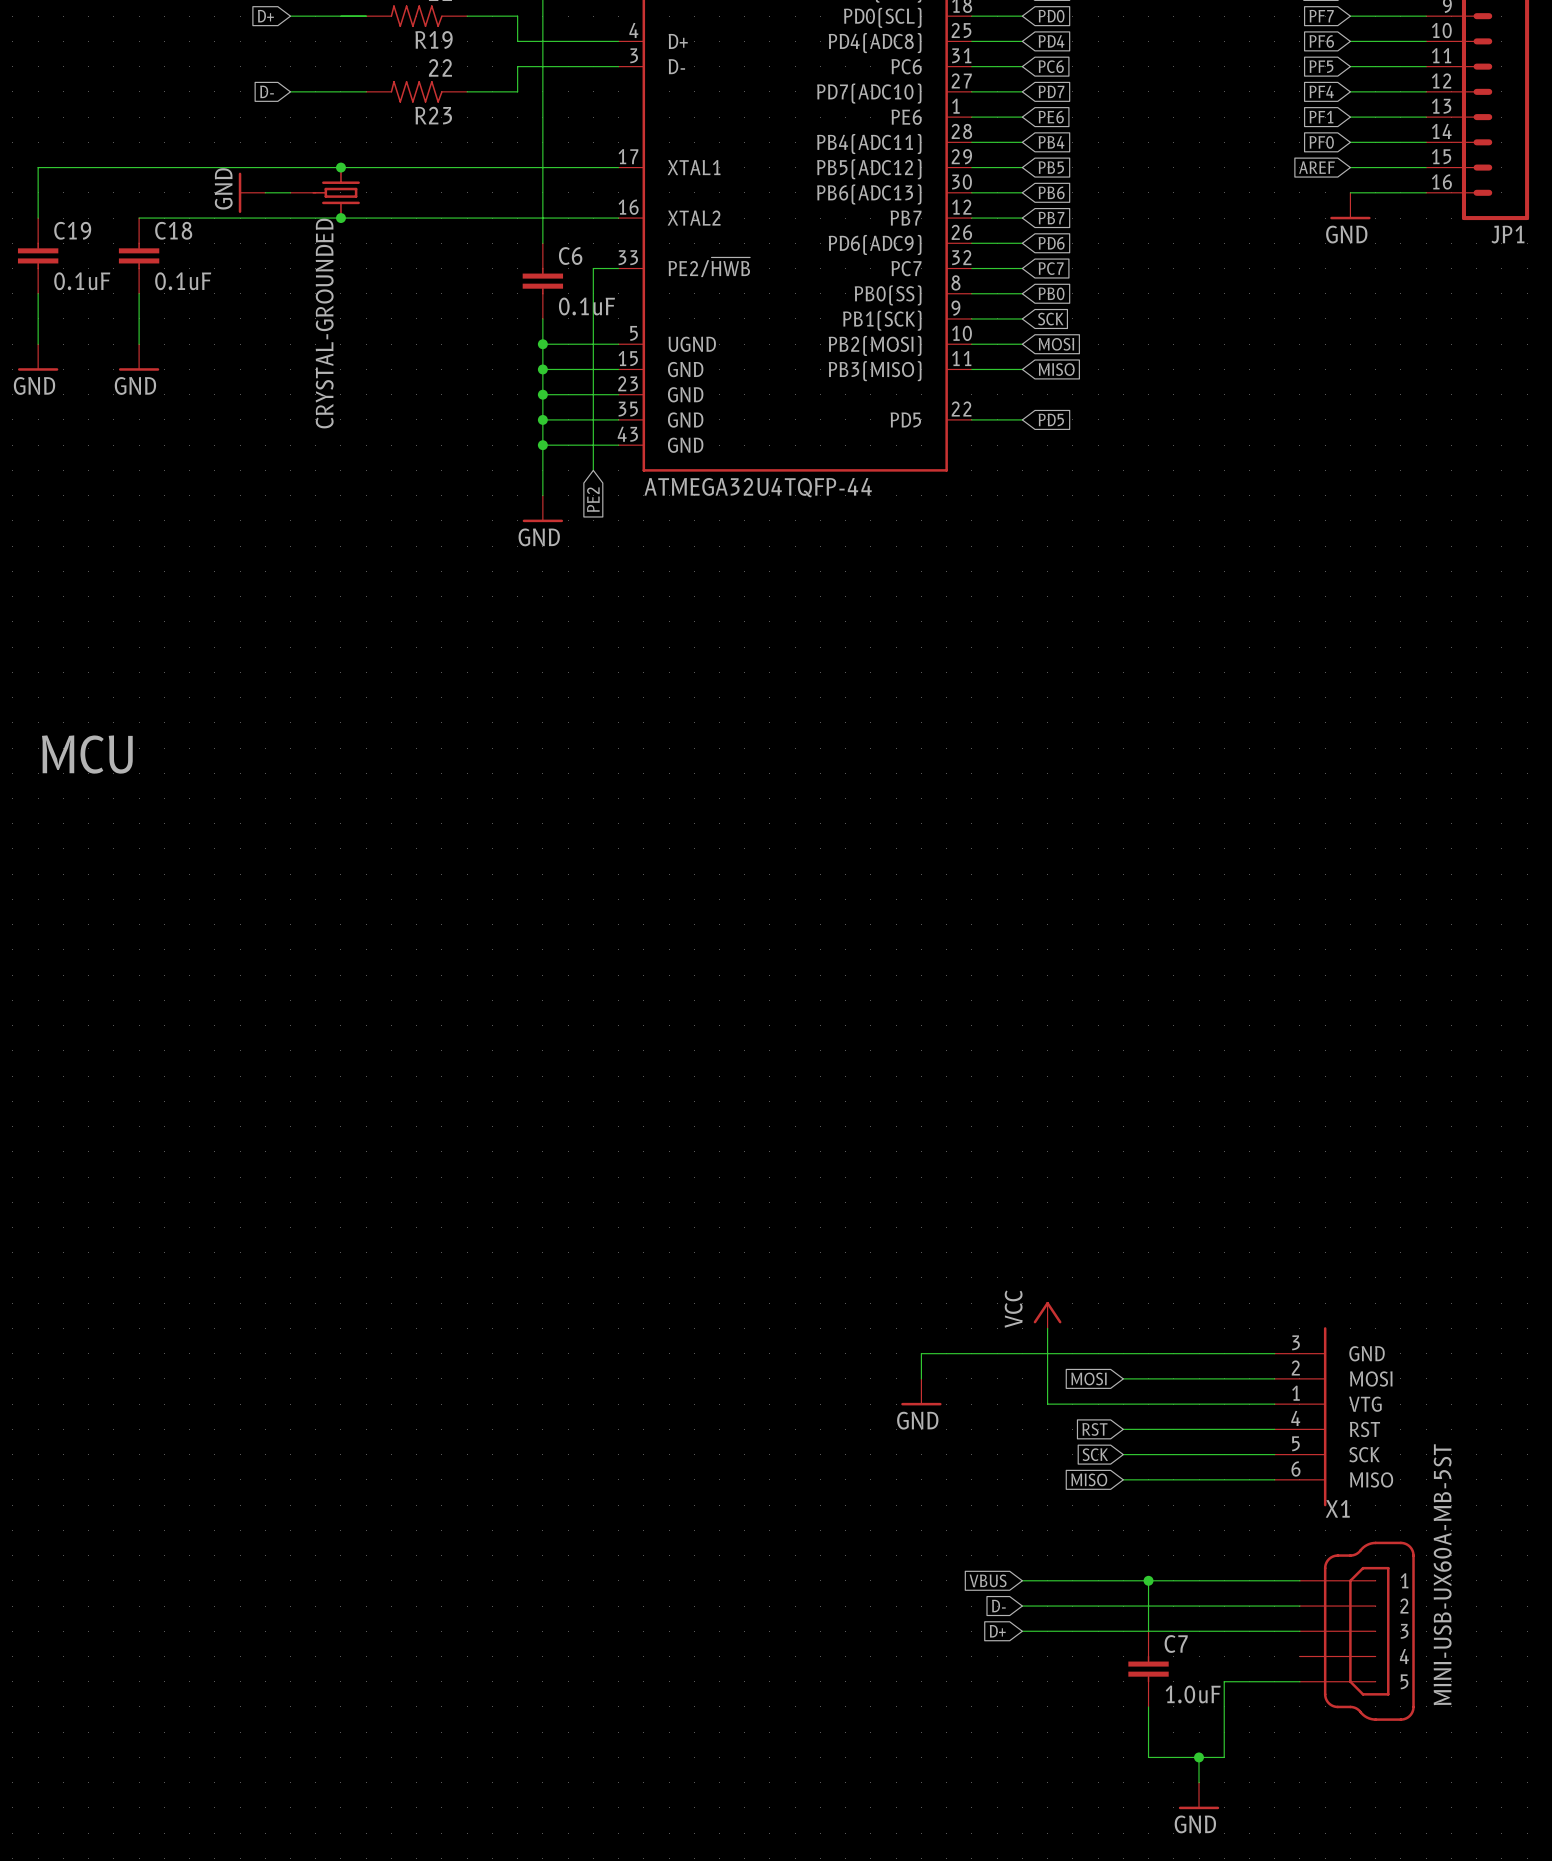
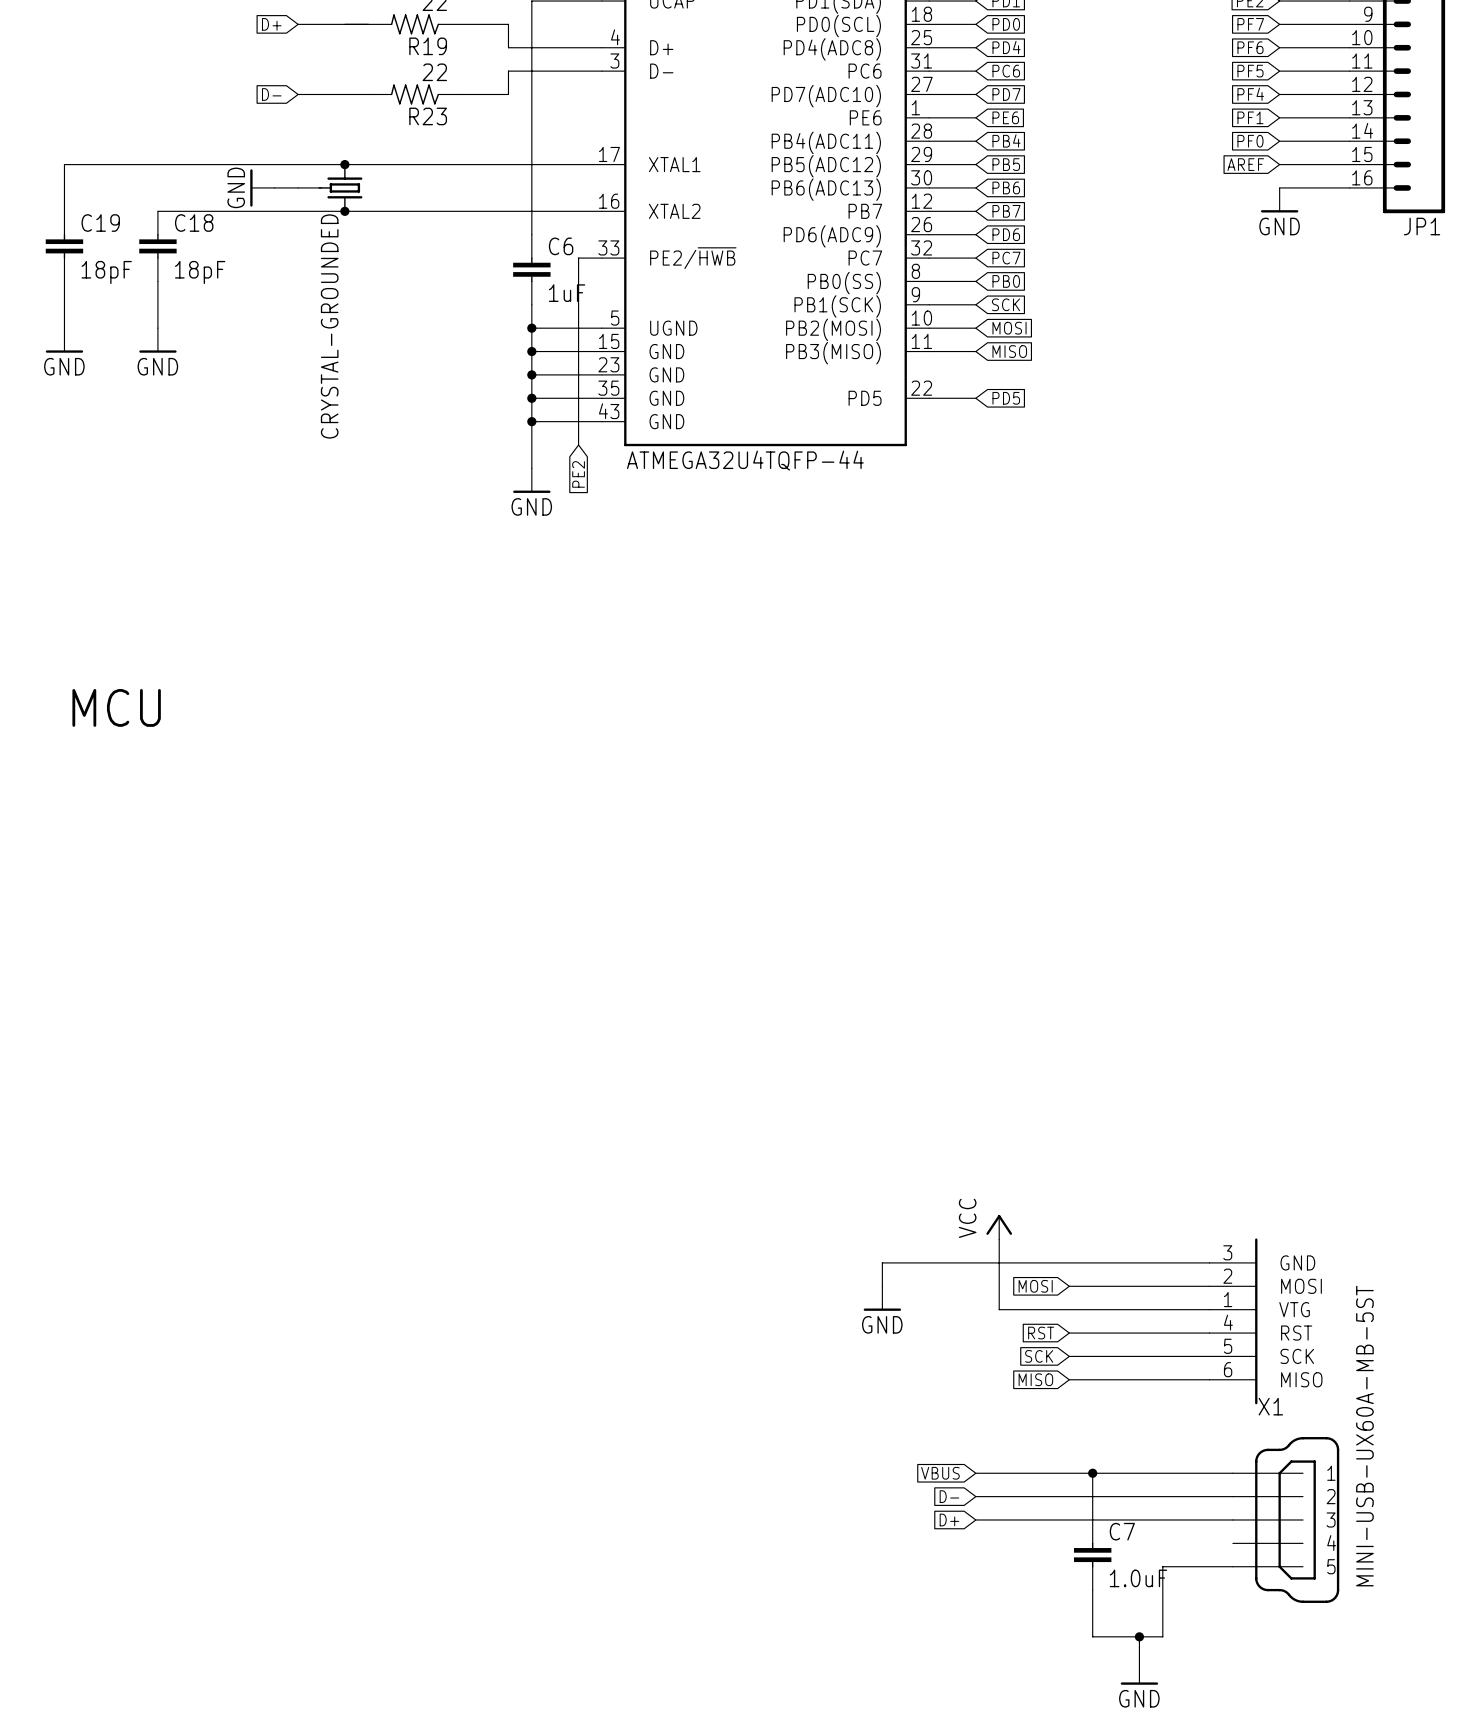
C19 value: 0.1uF (82, 281) -> 18pF (106, 272)
C18 value: 0.1uF (183, 281) -> 18pF (200, 272)
C6 value: 0.1uF (586, 306) -> 1uF (567, 293)

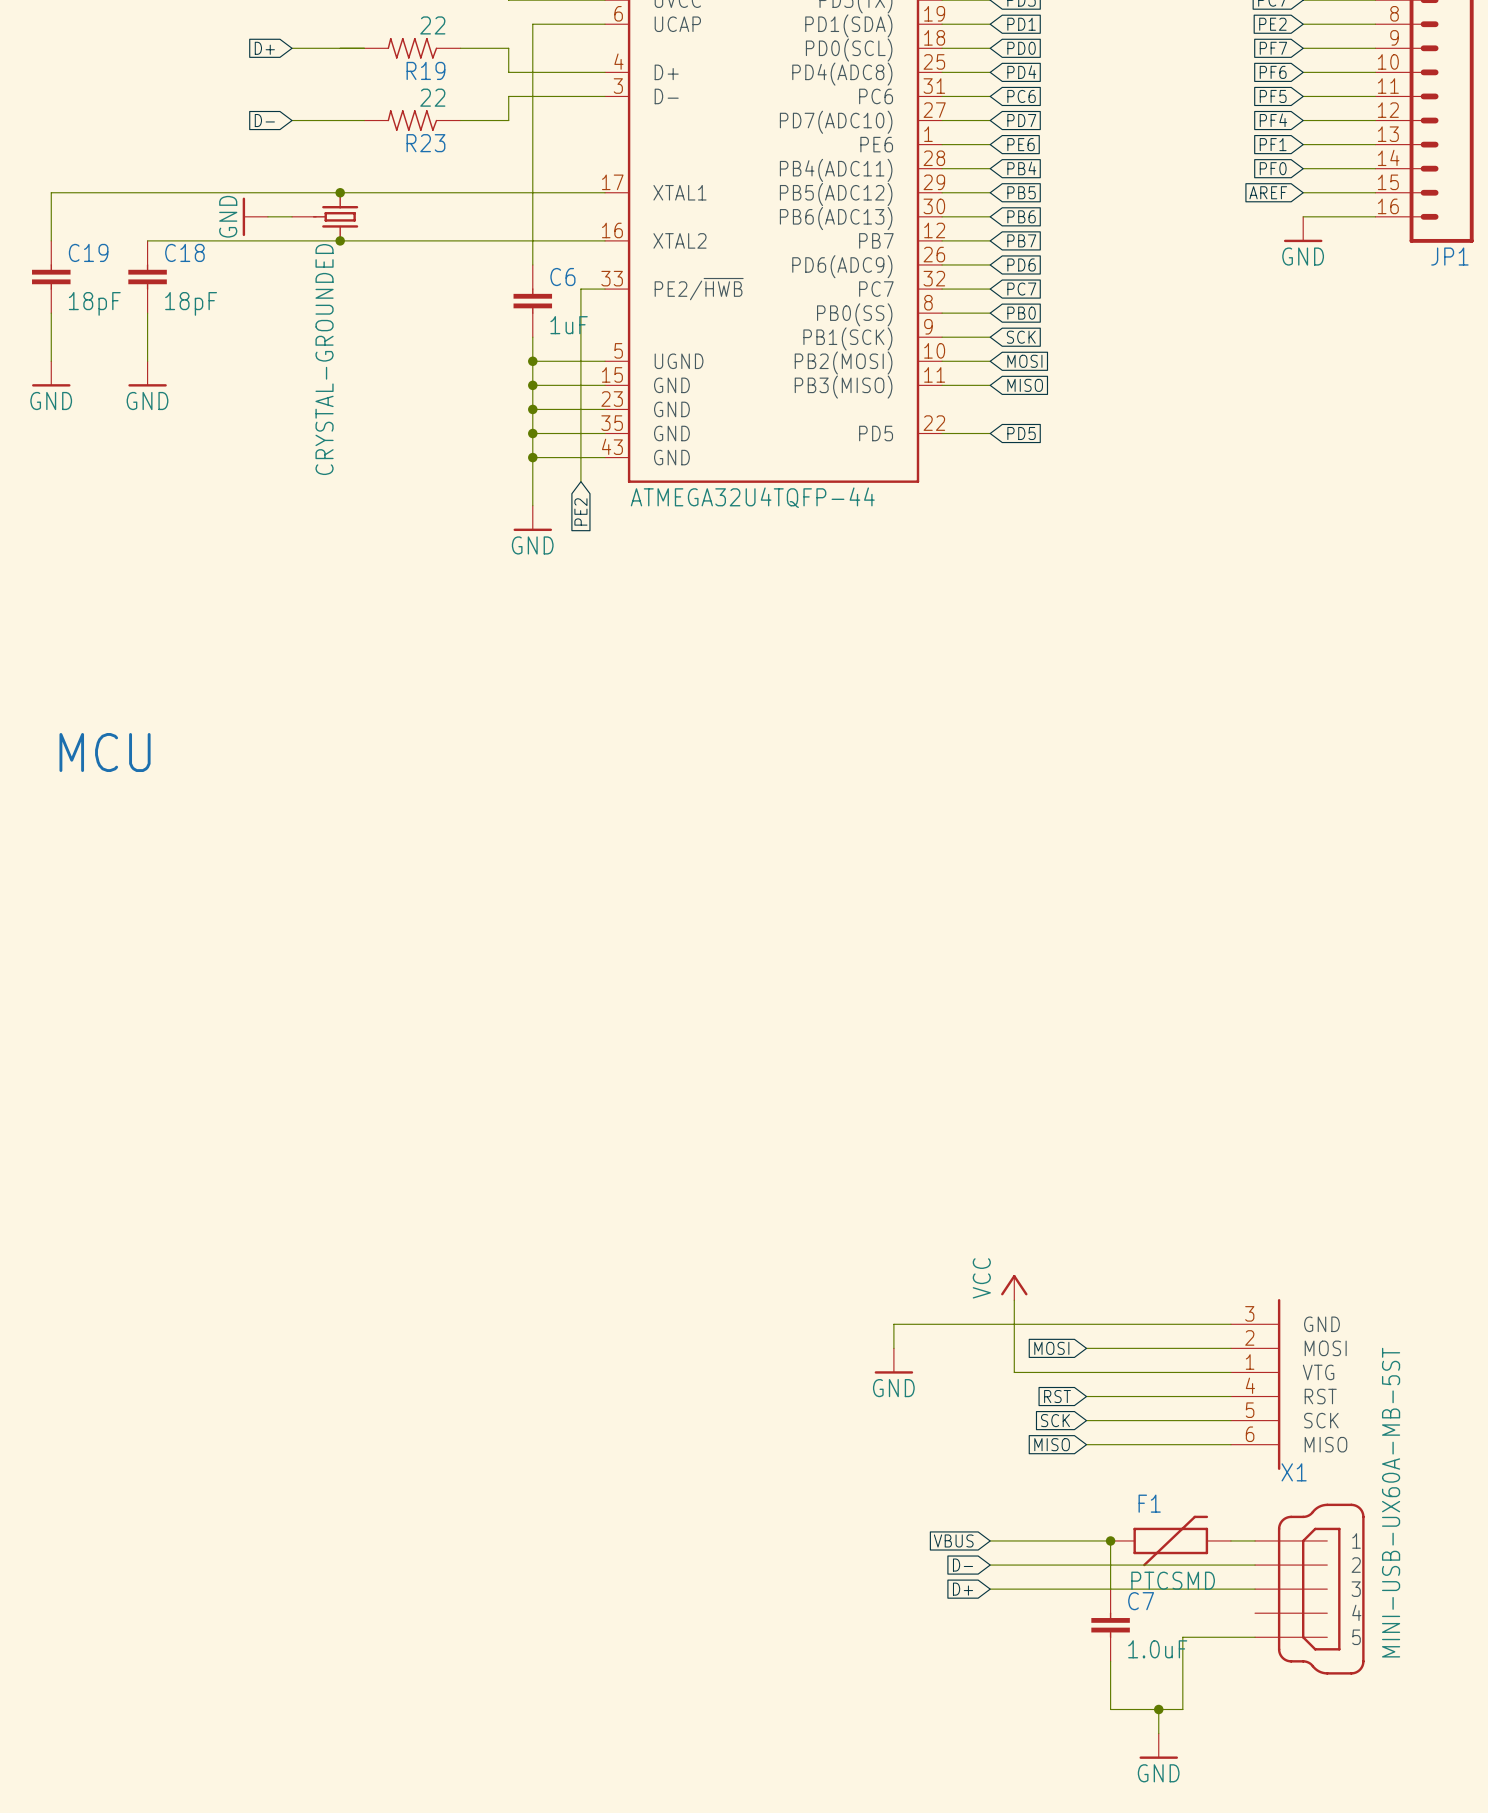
wire: (1092, 1473) (1209, 1473) -> none
F1: none -> PTCSMD (1170, 1540)

